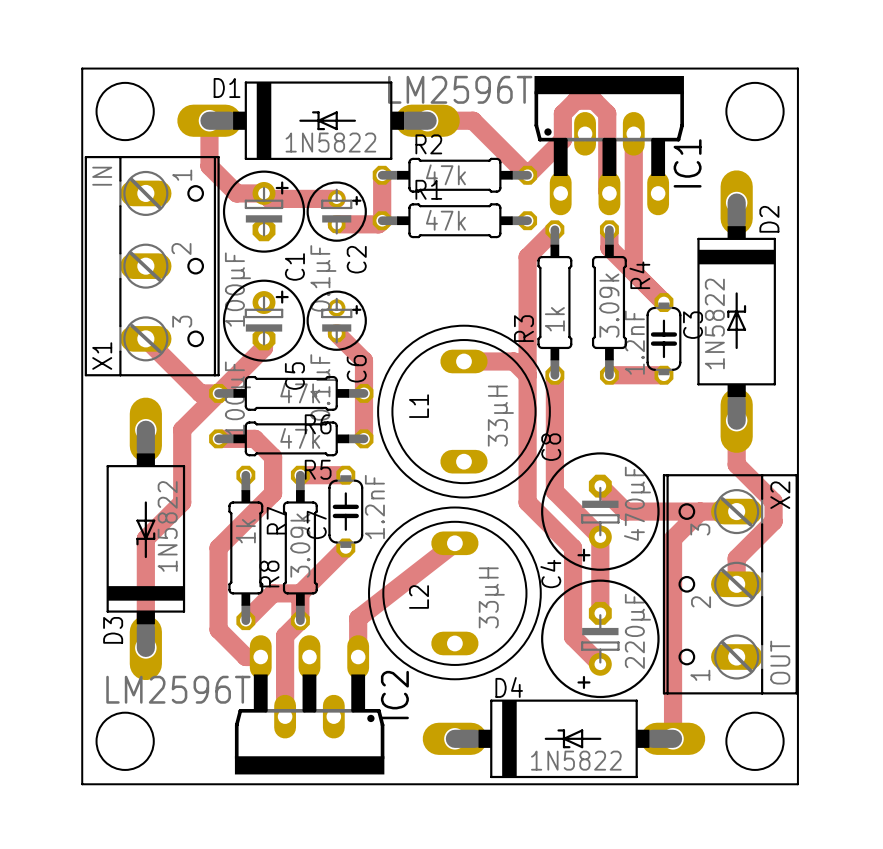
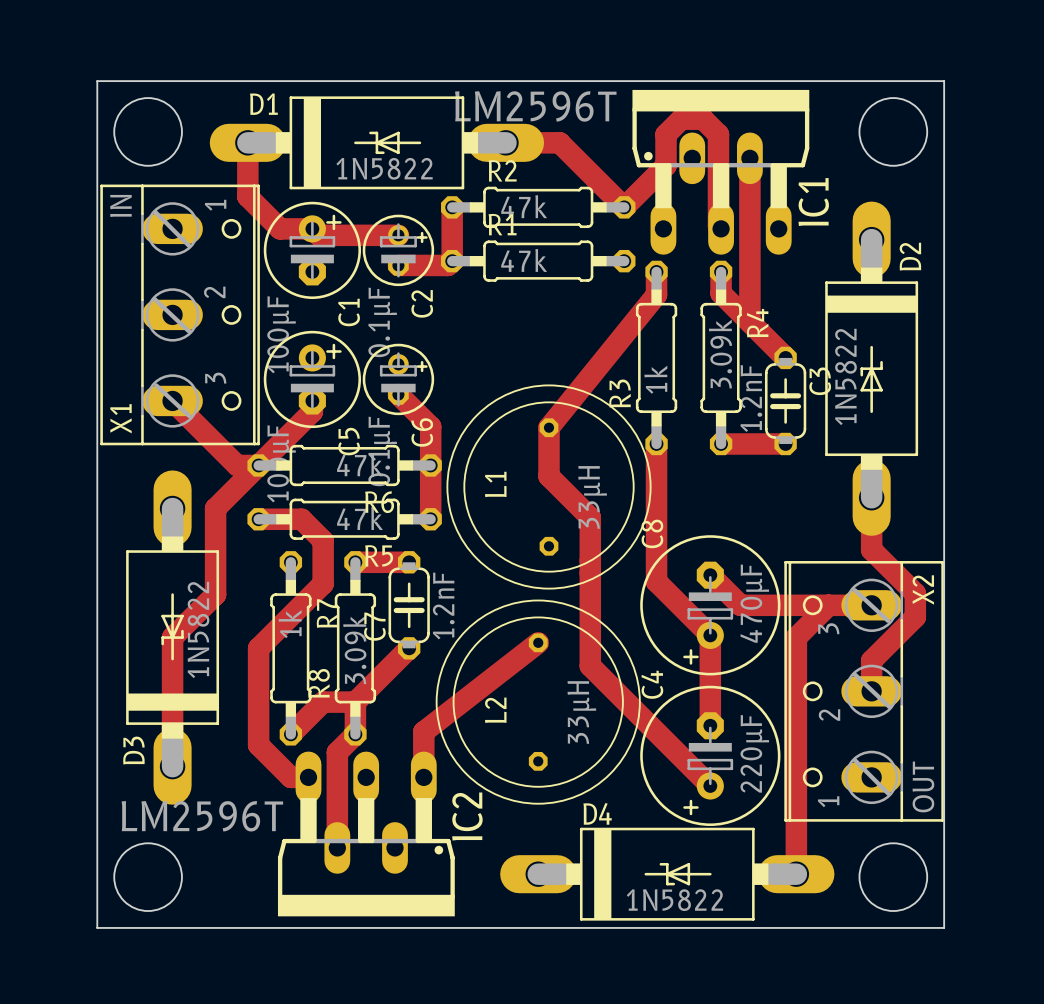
track: (554, 229) (527, 257) (527, 375) -> none
L1 footprint: [377, 324, 551, 499] -> [446, 384, 652, 590]
track: (463, 361) (513, 361) (527, 375) -> none
track: (527, 375) (527, 502) (573, 547) (573, 637) -> (656, 271) (656, 294) (549, 427) (549, 476) (590, 517) (590, 665) (678, 753)
L2 footprint: [368, 506, 542, 680] -> [435, 599, 641, 805]

